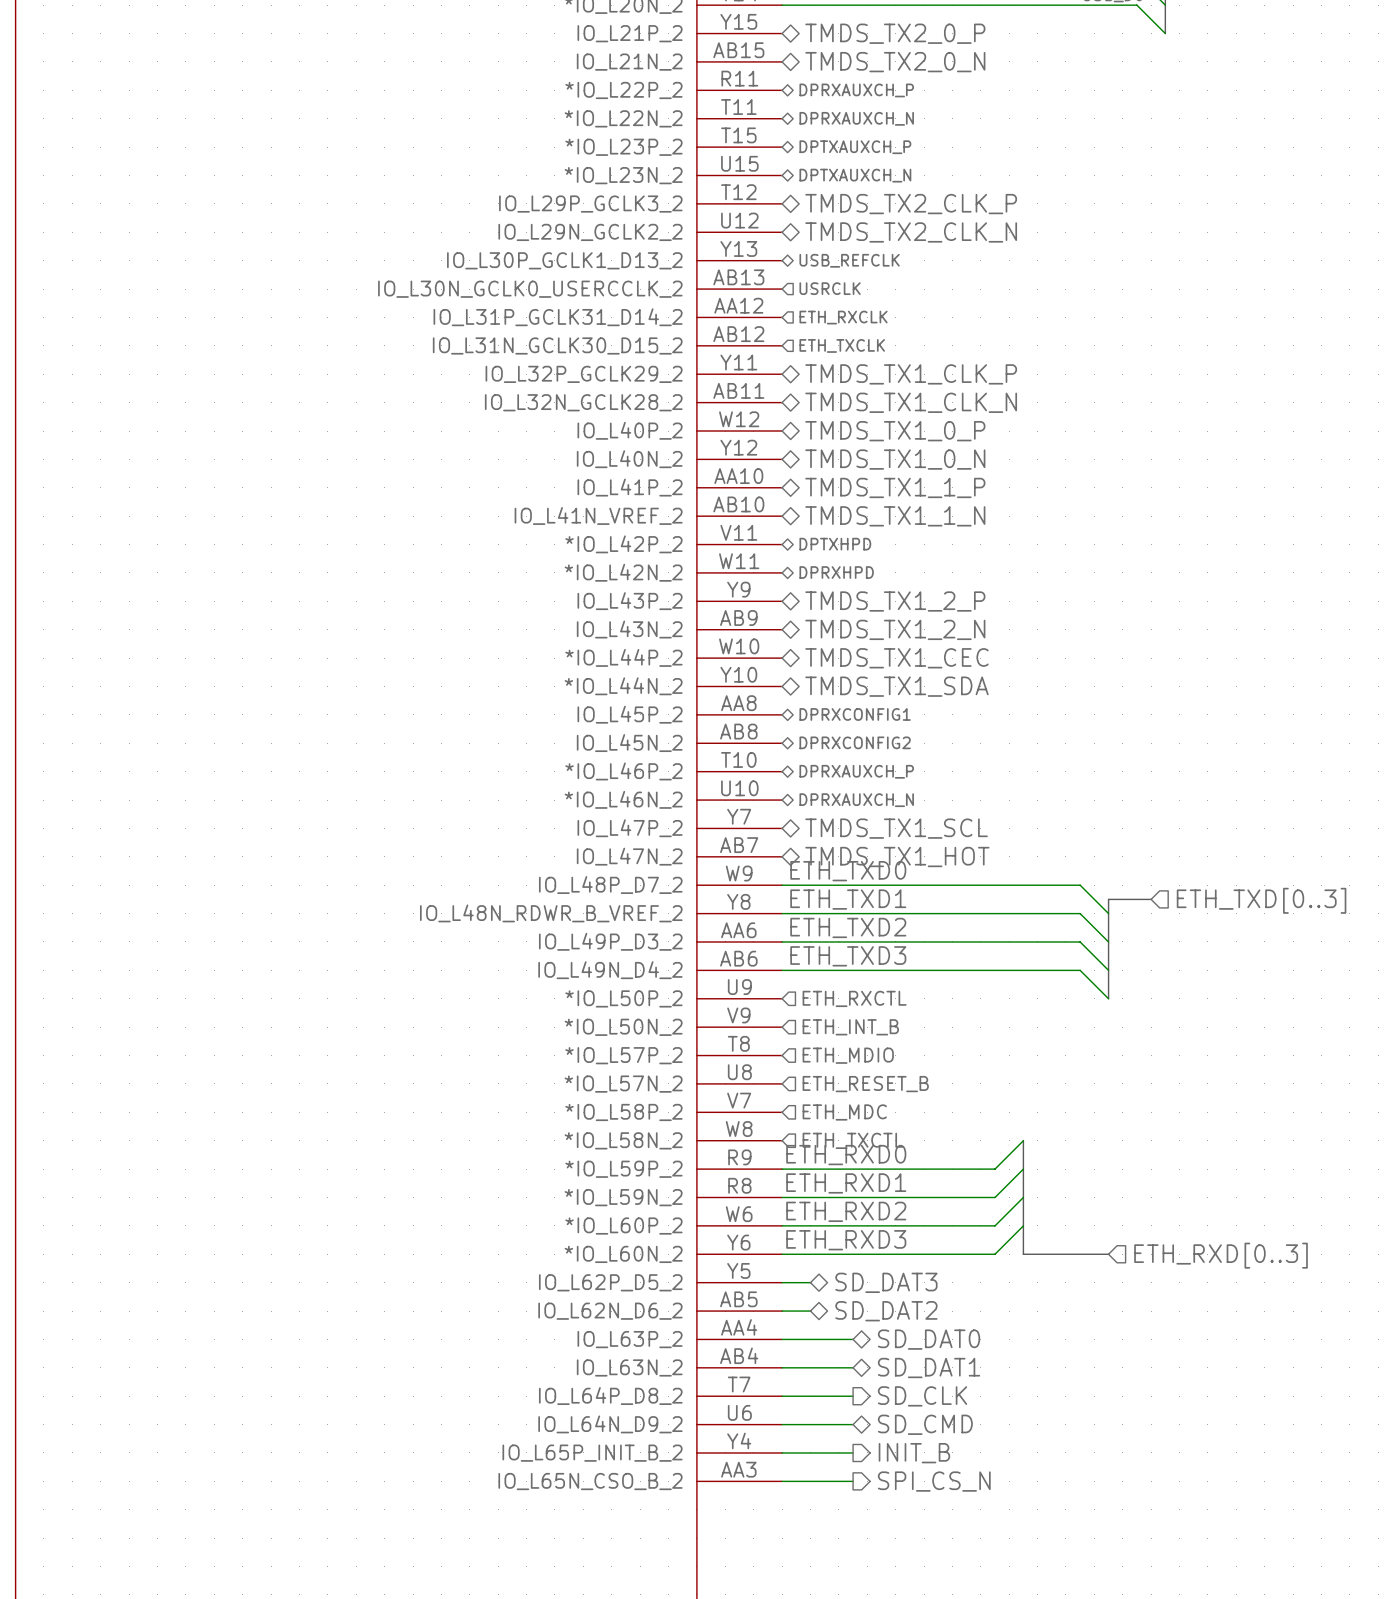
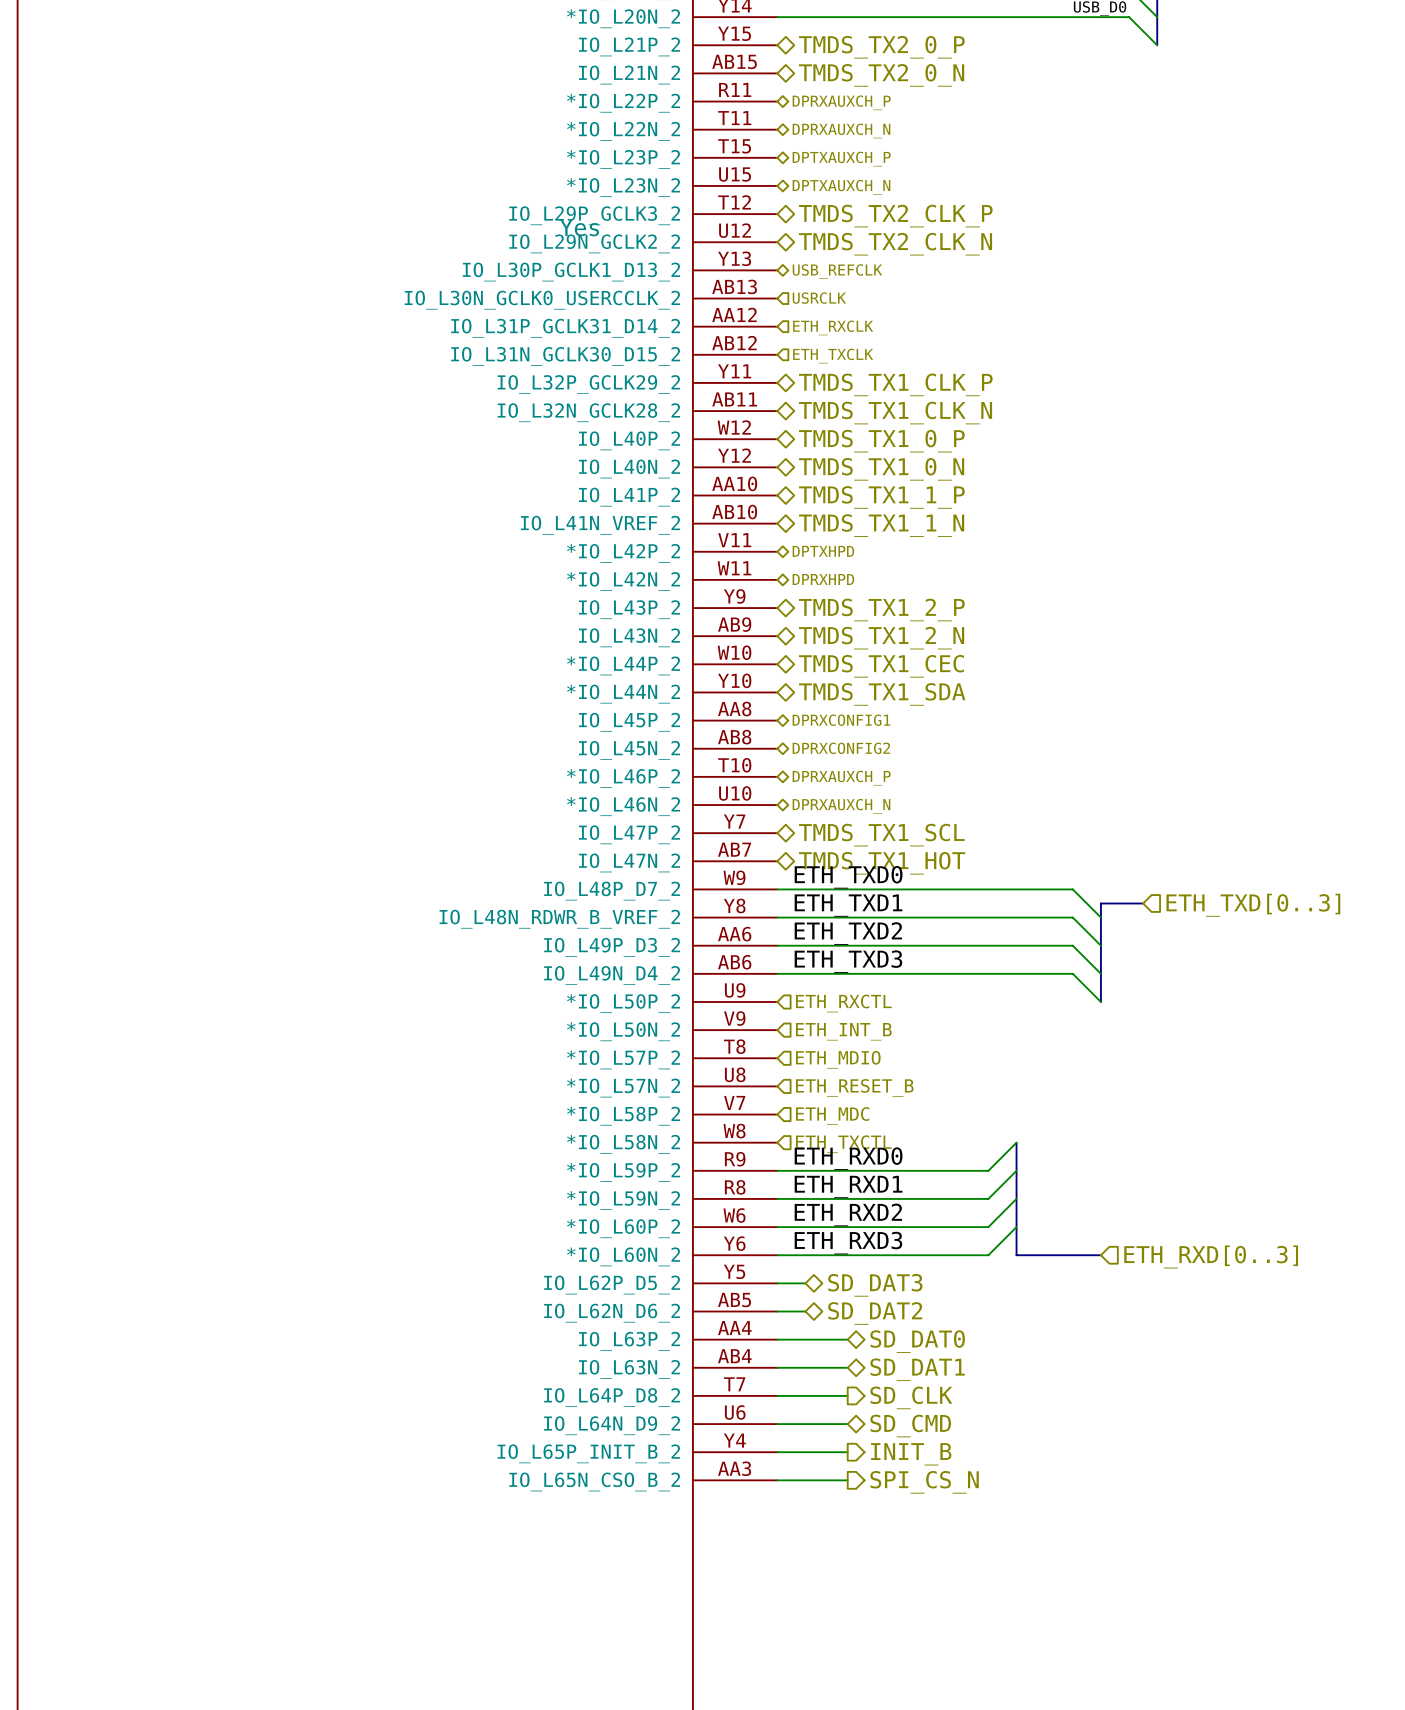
part text: none -> Yes (579, 227)

